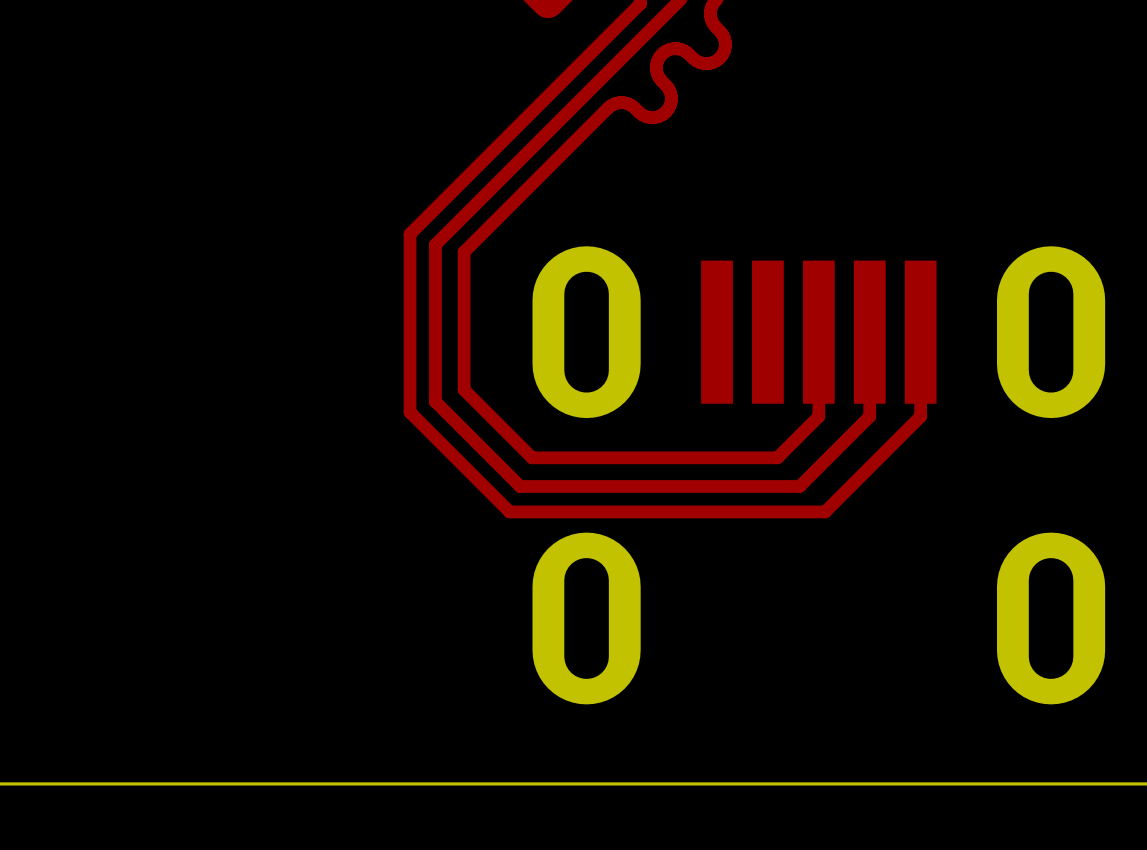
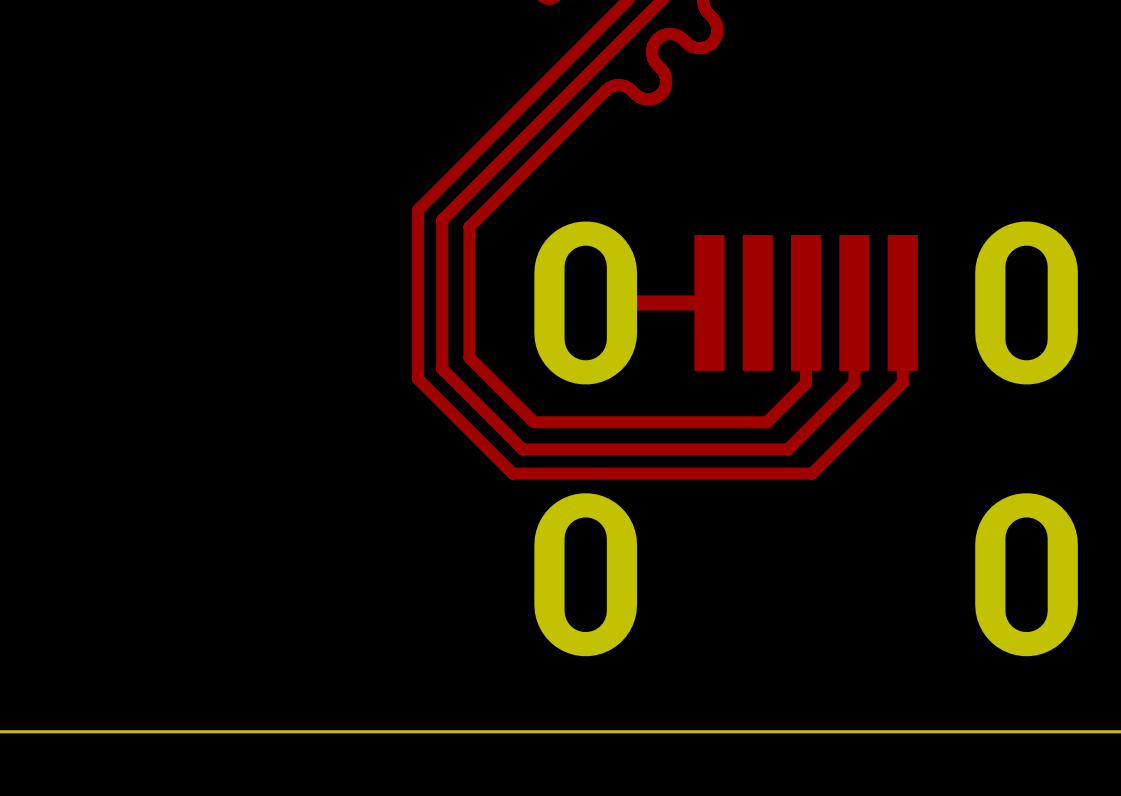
top track: none -> (709, 302) (585, 302)

